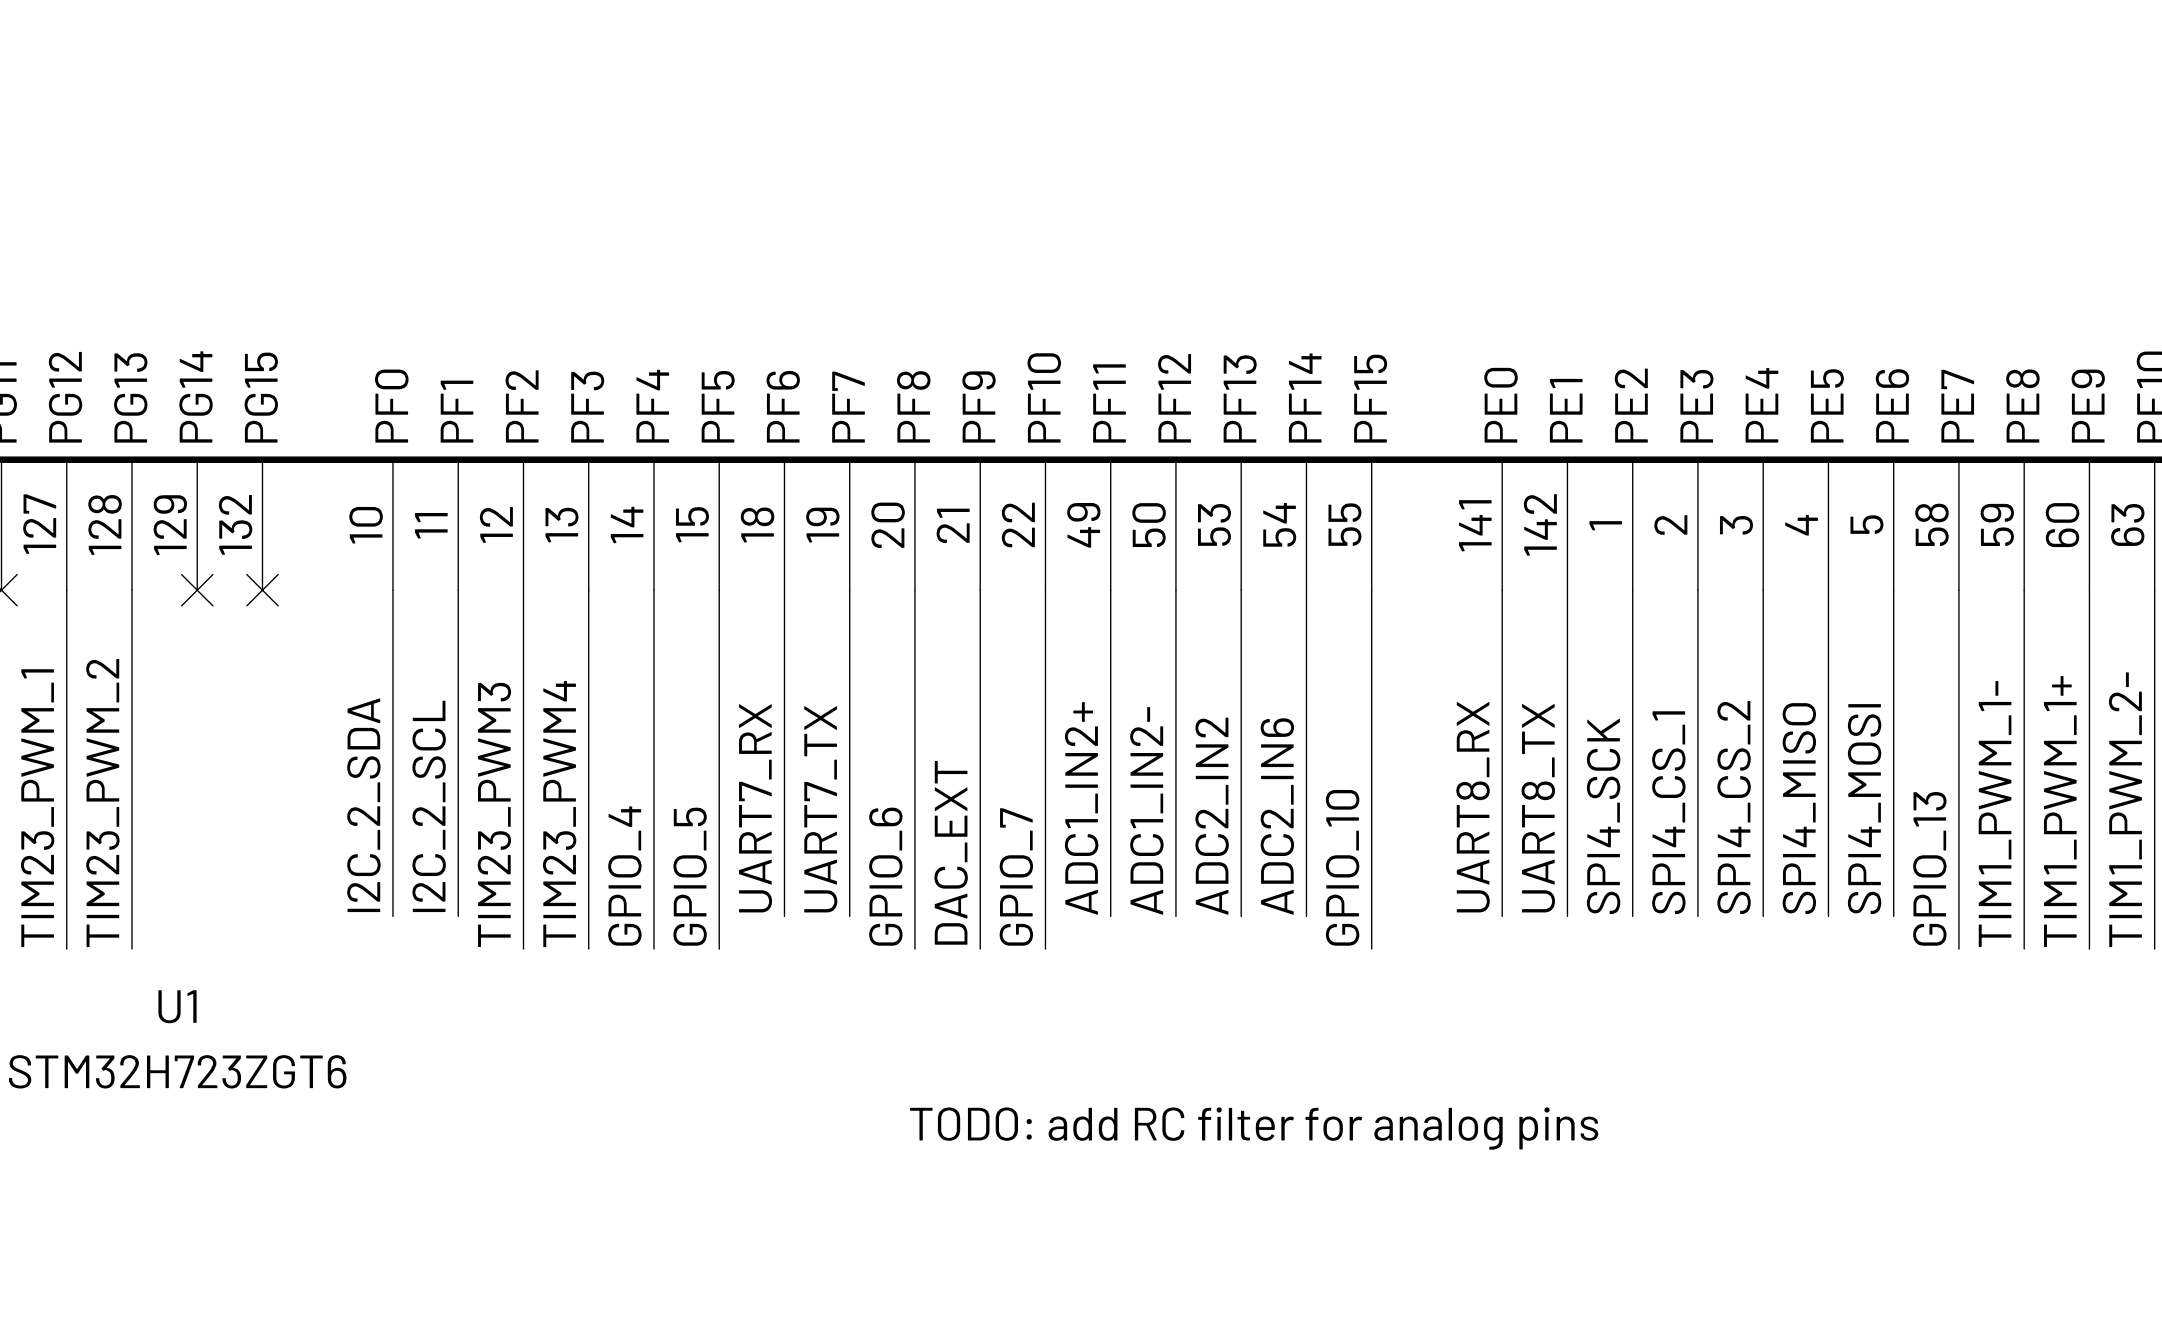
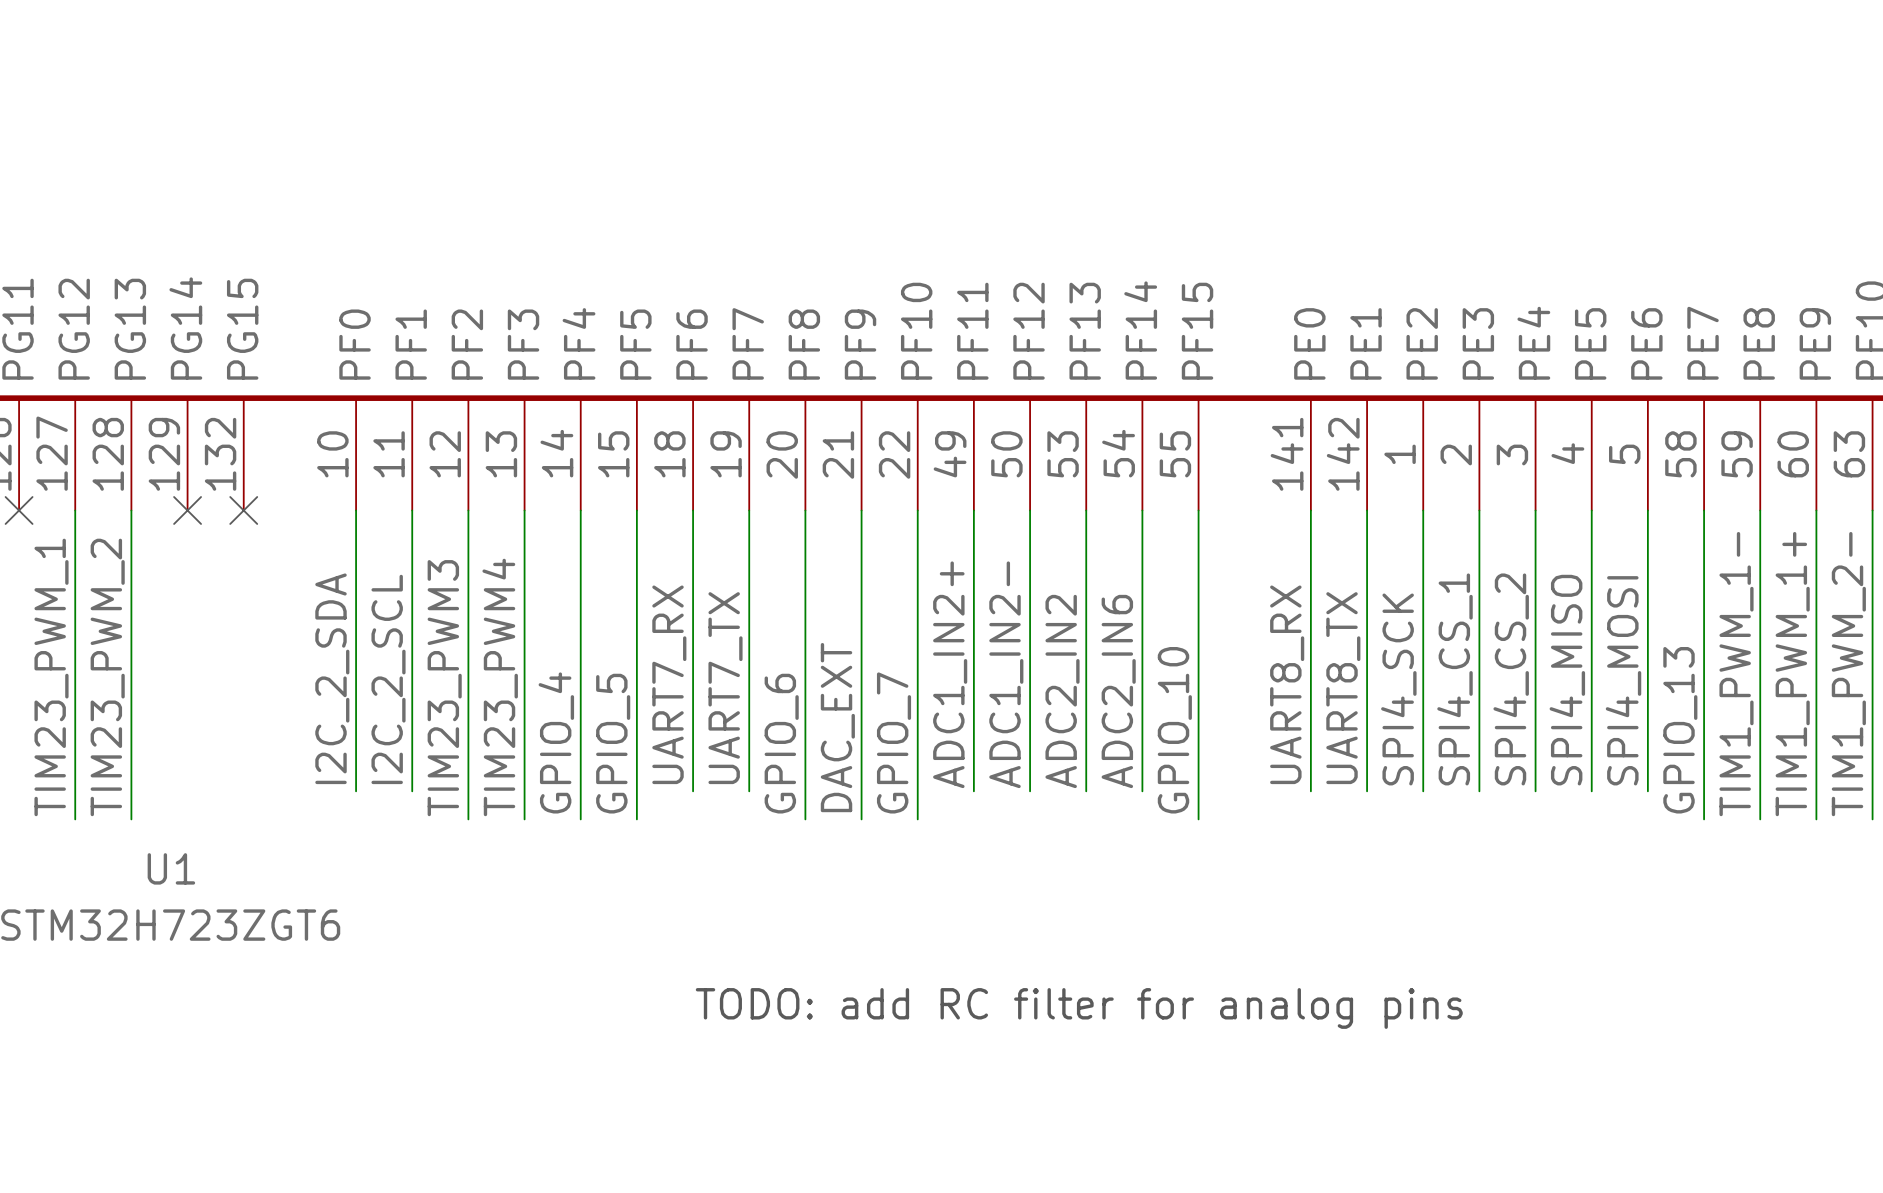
text position: TODO: add RC filter for analog pins (1254, 1128) -> TODO: add RC filter for analog pins (1079, 1008)

